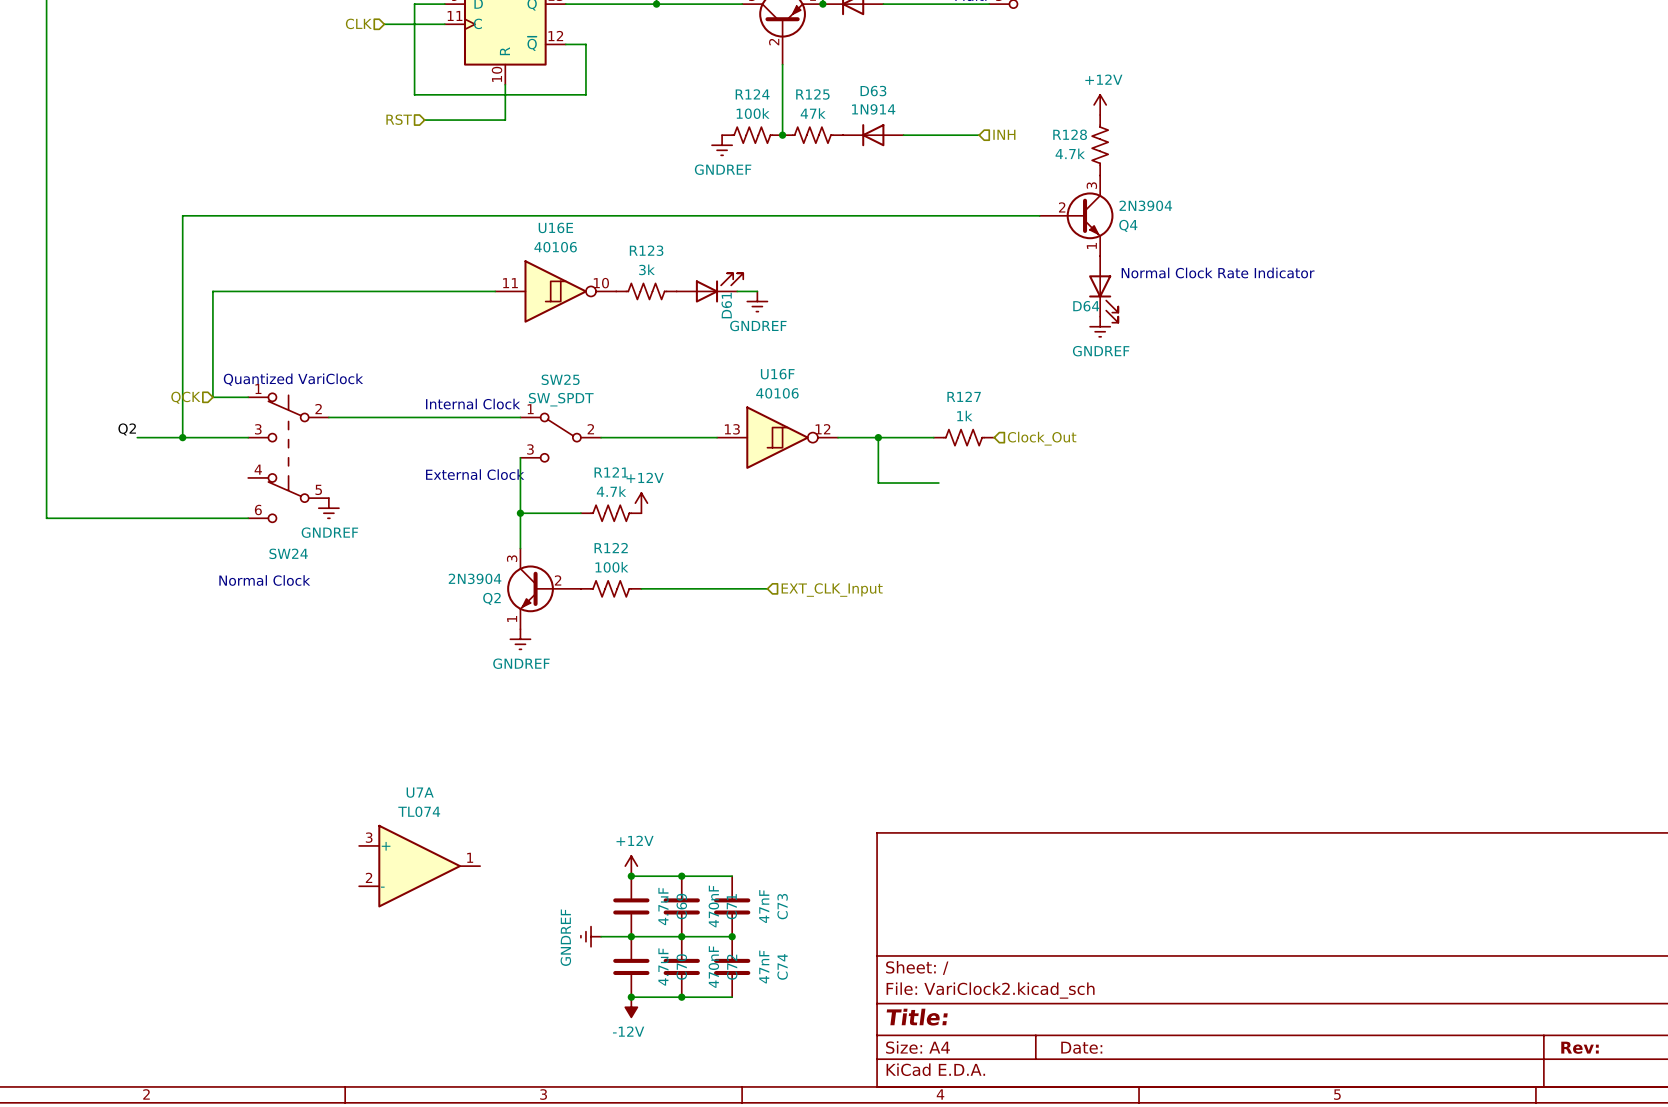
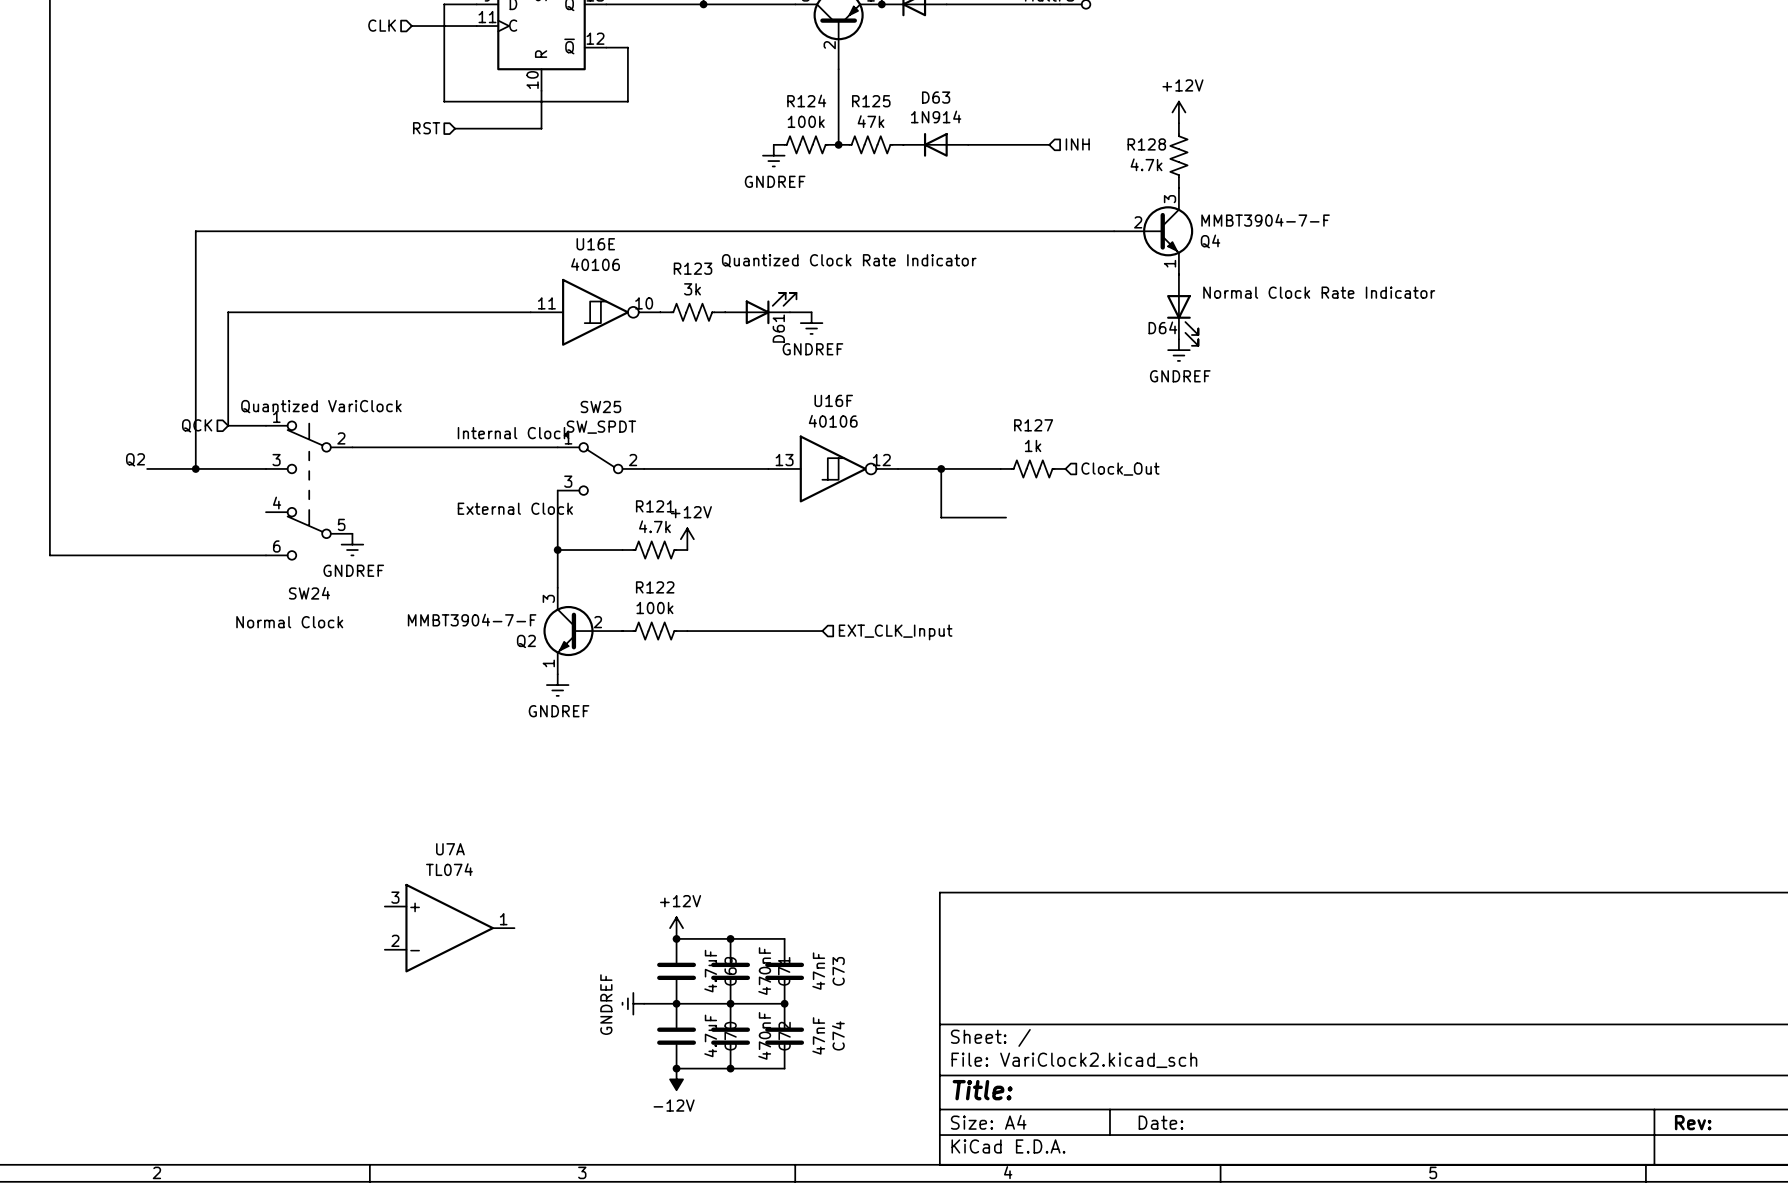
Q4 value: 2N3904 (1145, 205) -> MMBT3904-7-F (1265, 220)
text: none -> Quantized Clock Rate Indicator (849, 260)
Q2 value: 2N3904 (475, 578) -> MMBT3904-7-F (472, 620)

